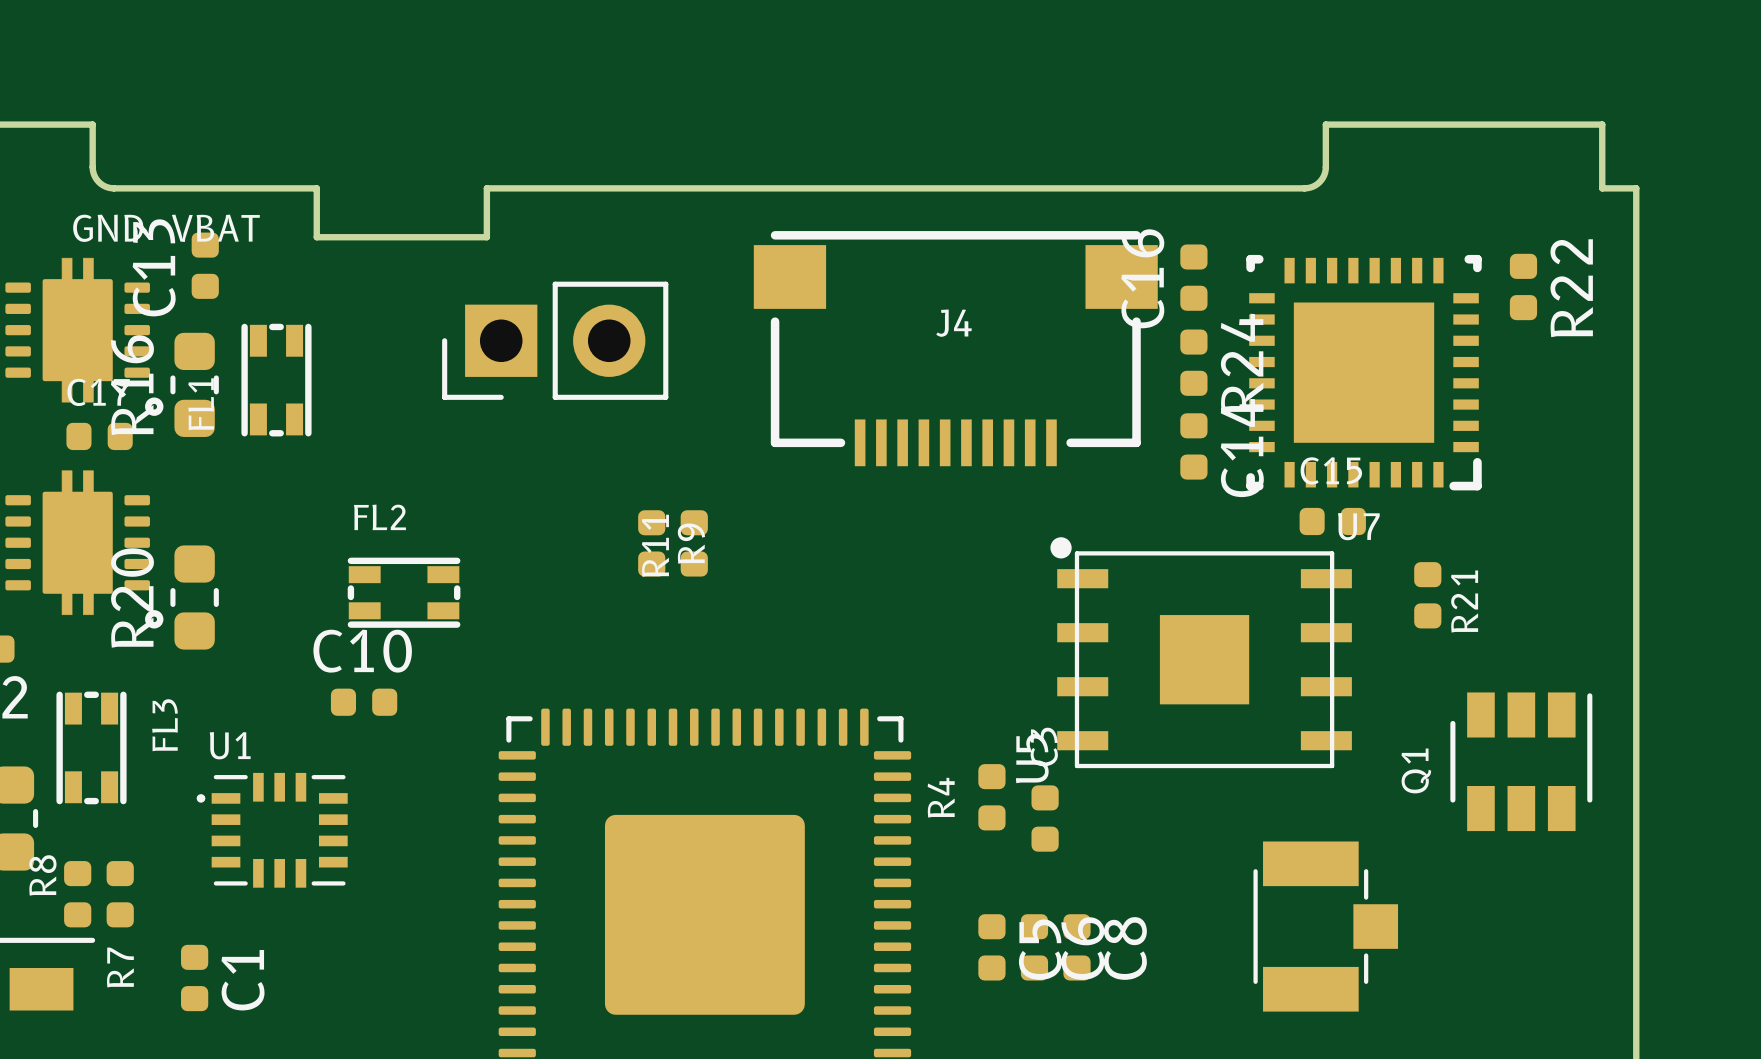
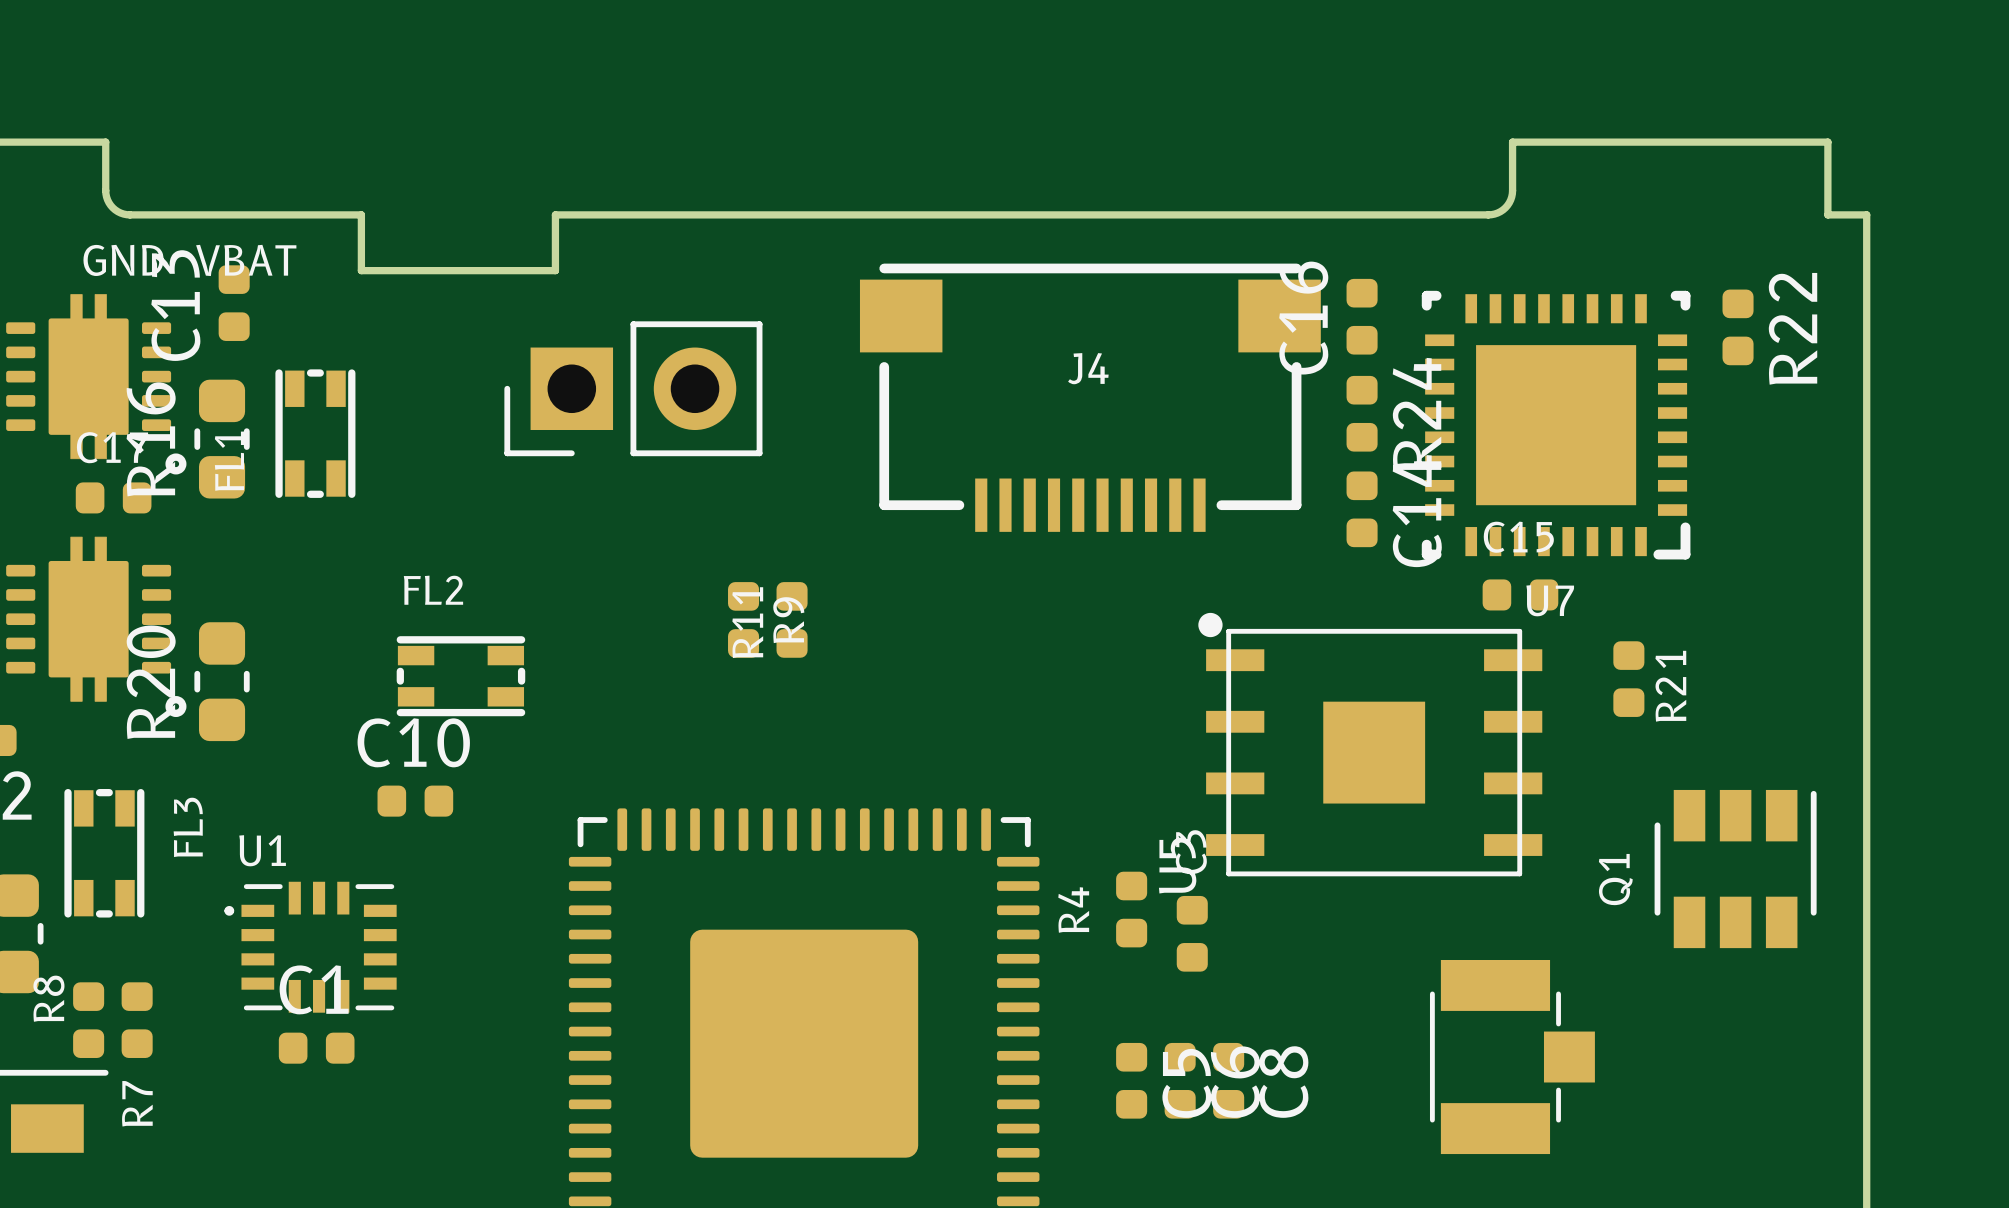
C1 rotation: 0° (194, 977) -> 90° clockwise (316, 1048)
C1 position: (194, 977) -> (316, 1048)

